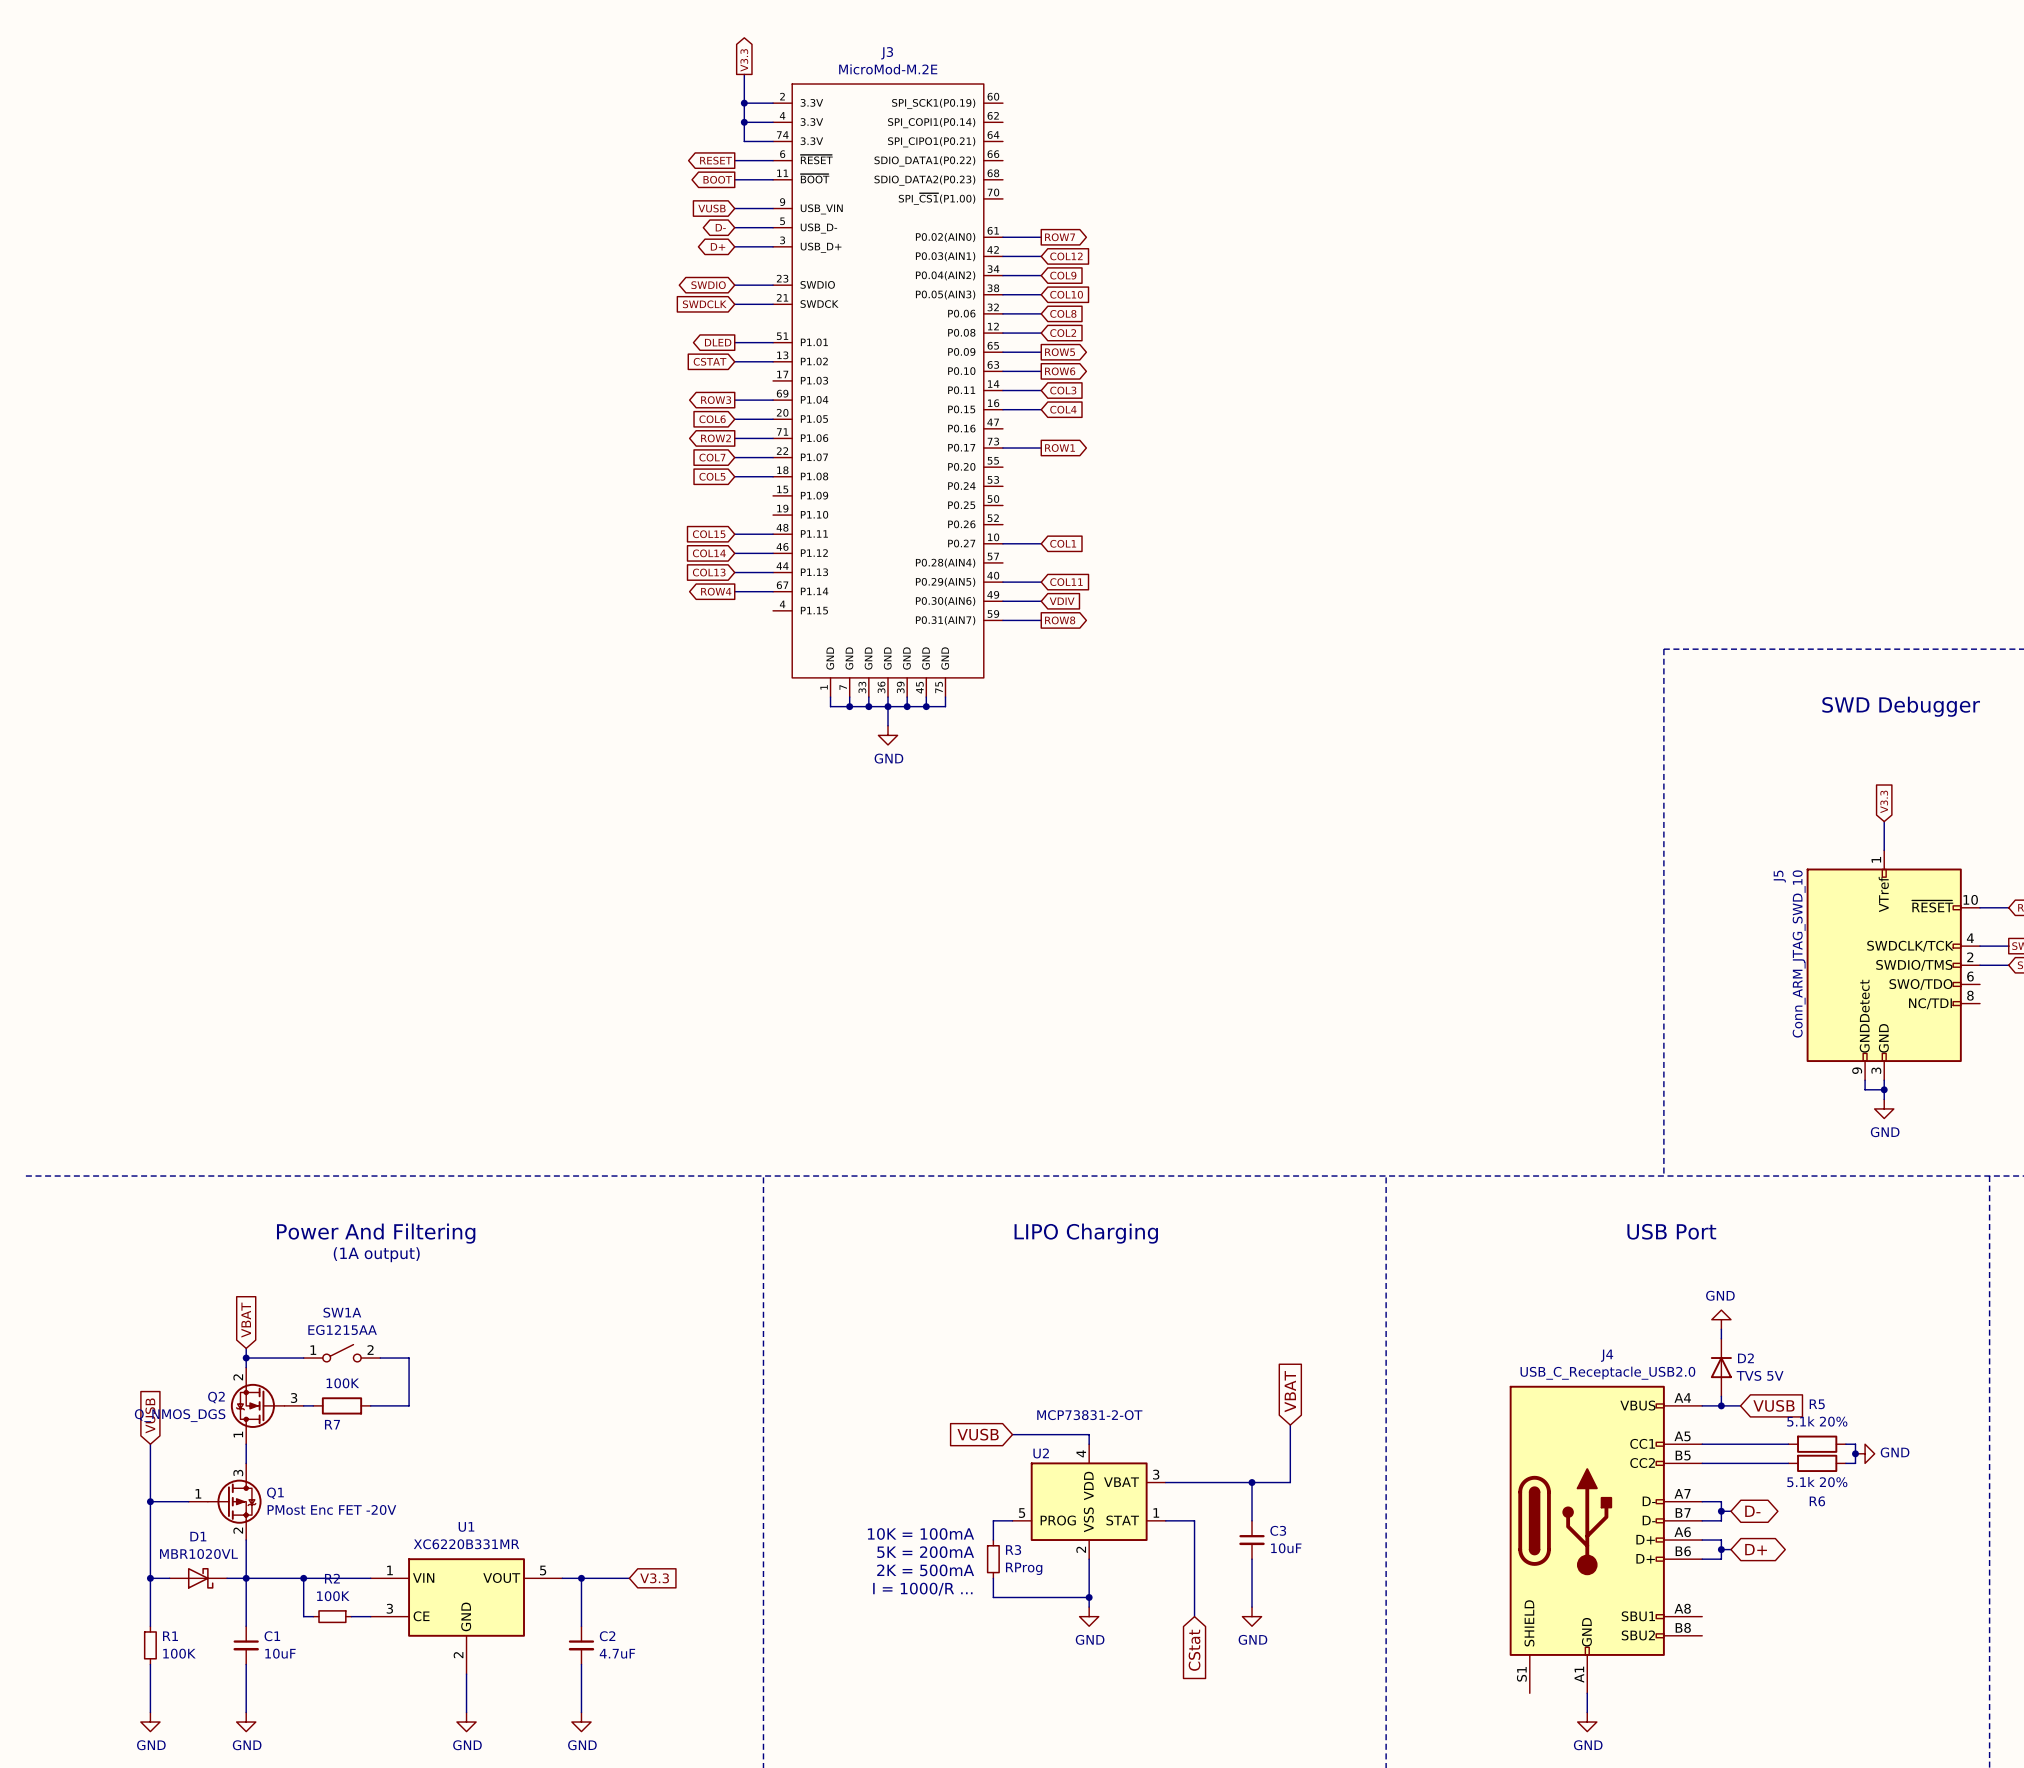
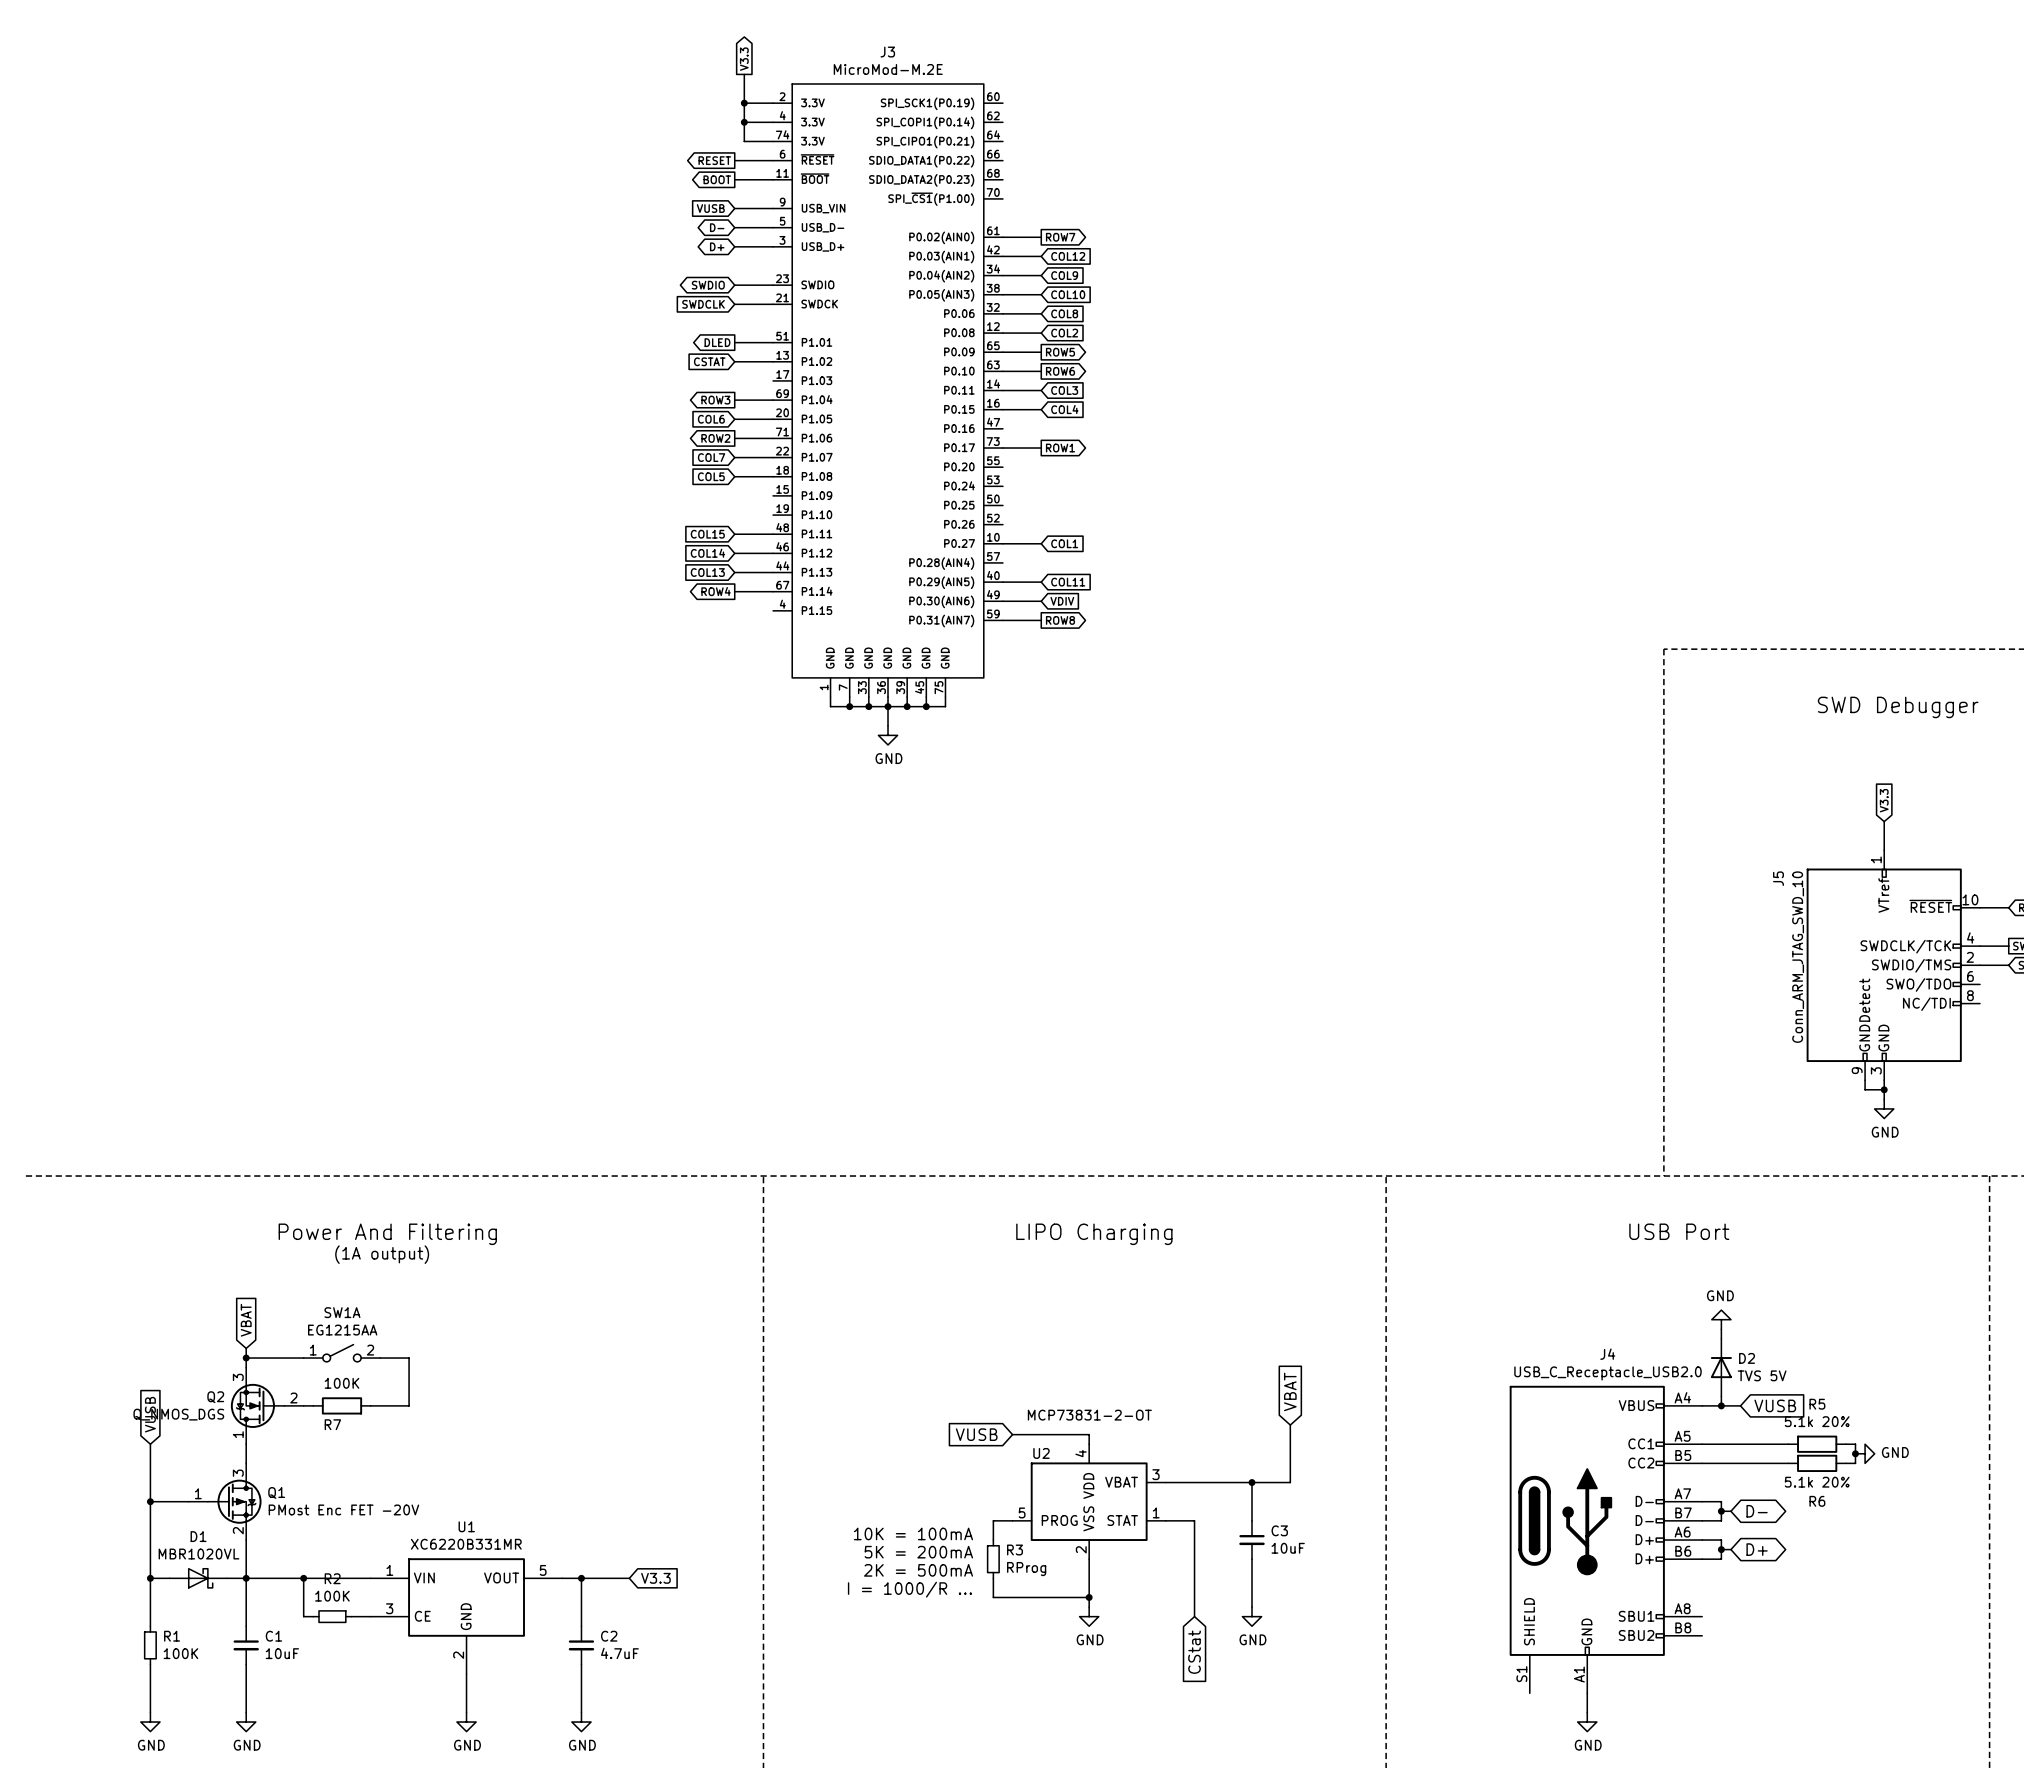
Q2 pin number: 2 (238, 1377) -> 3 (238, 1377)
Q2 pin number: 3 (294, 1398) -> 2 (293, 1398)

